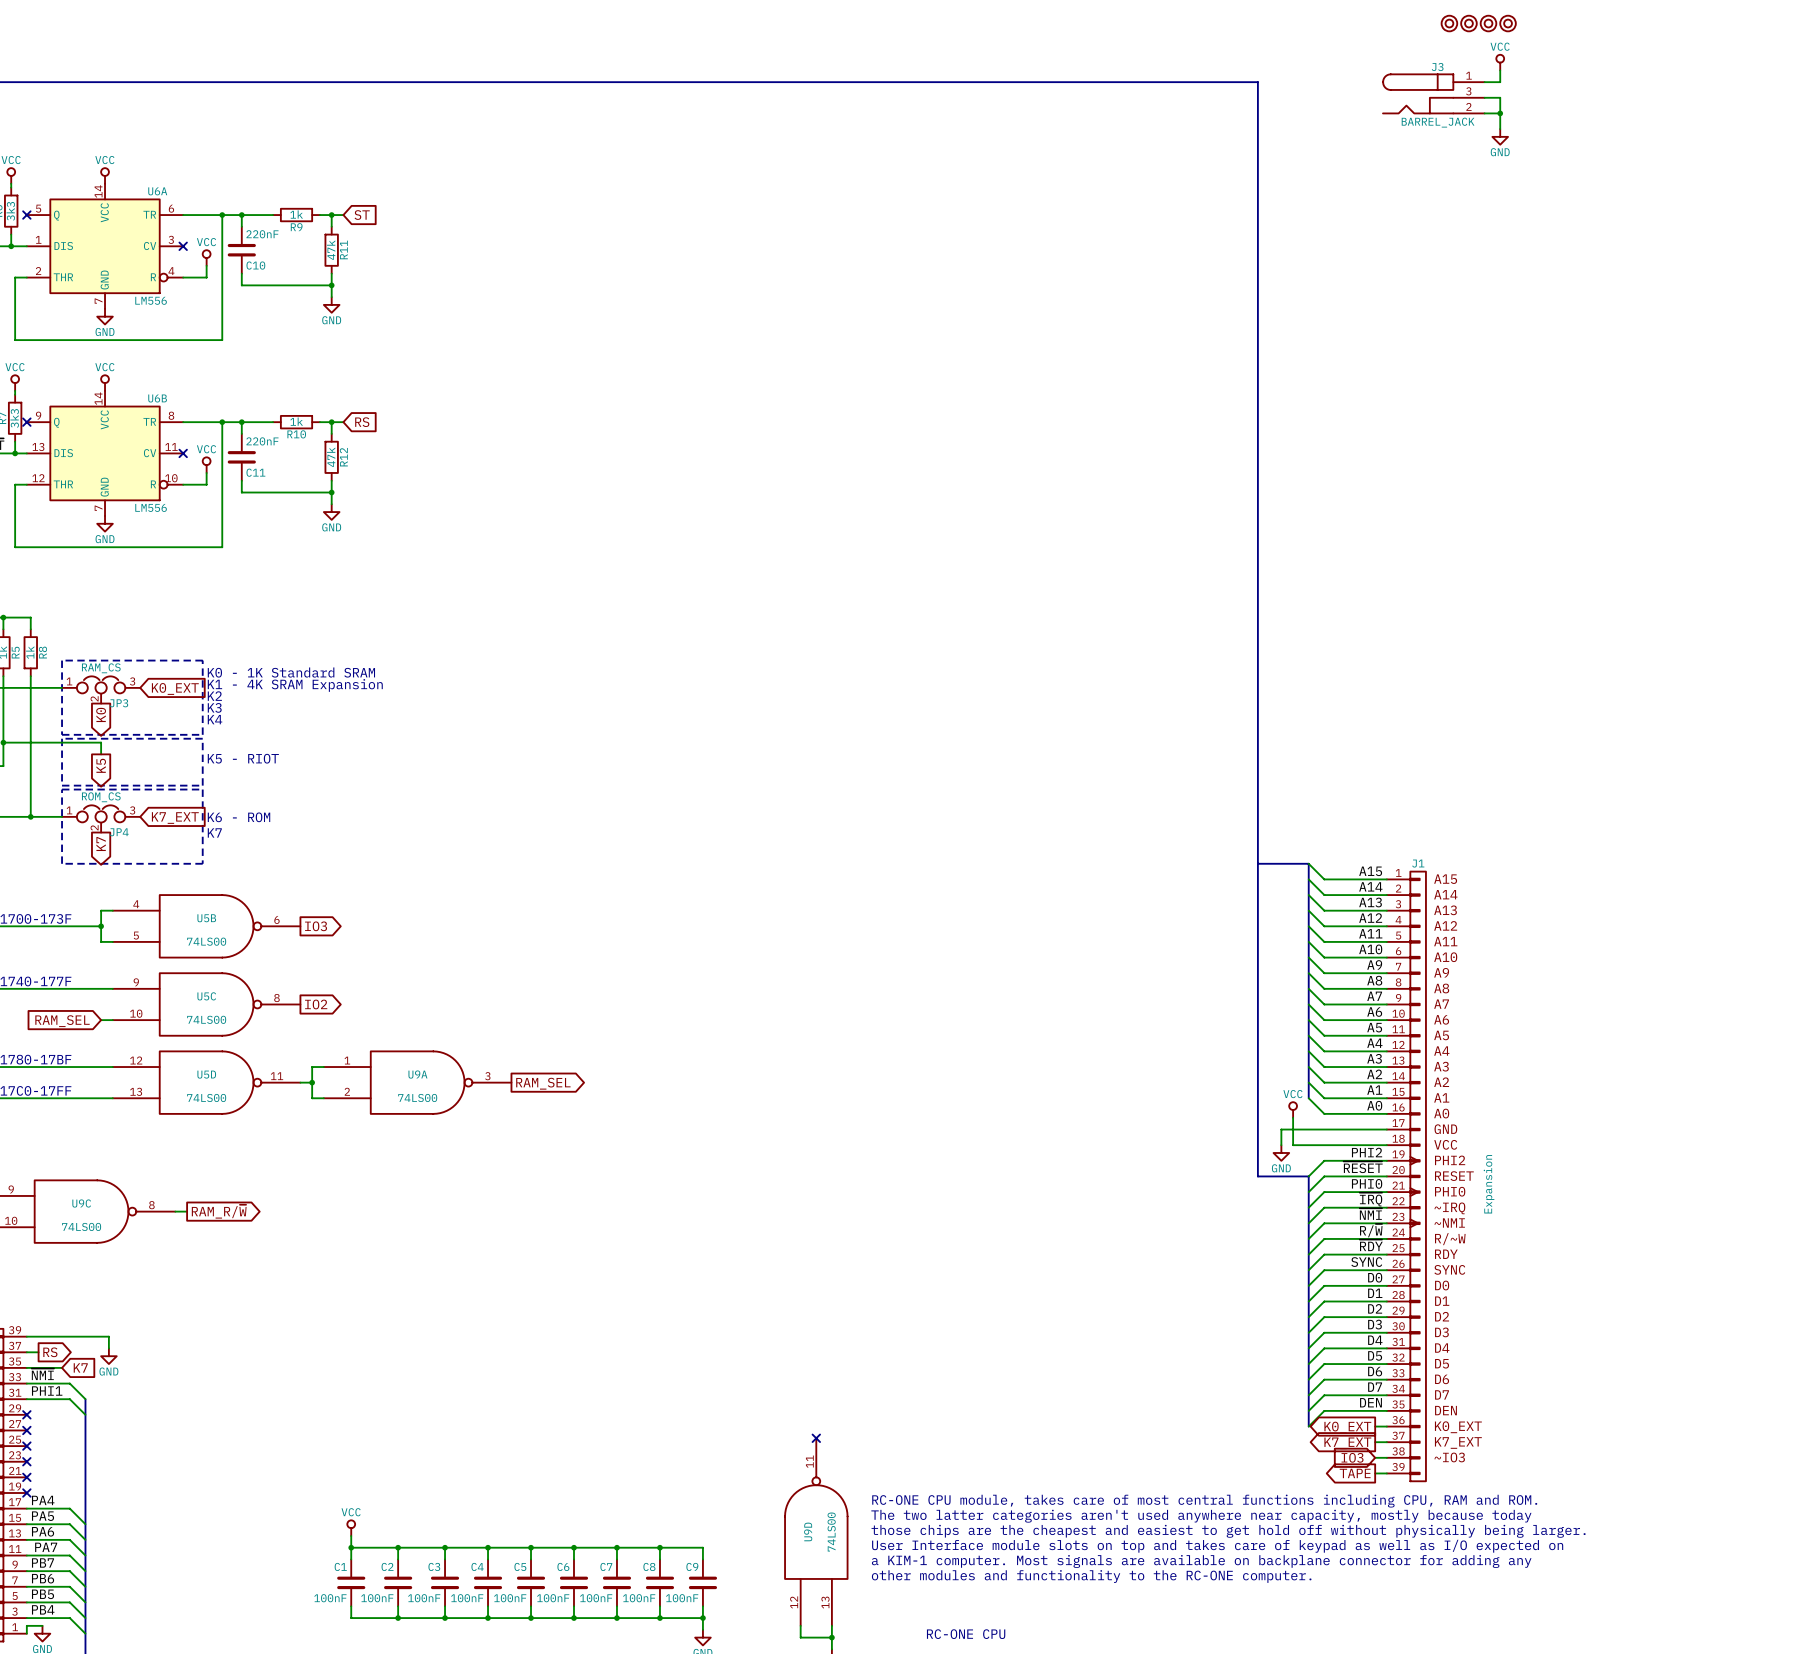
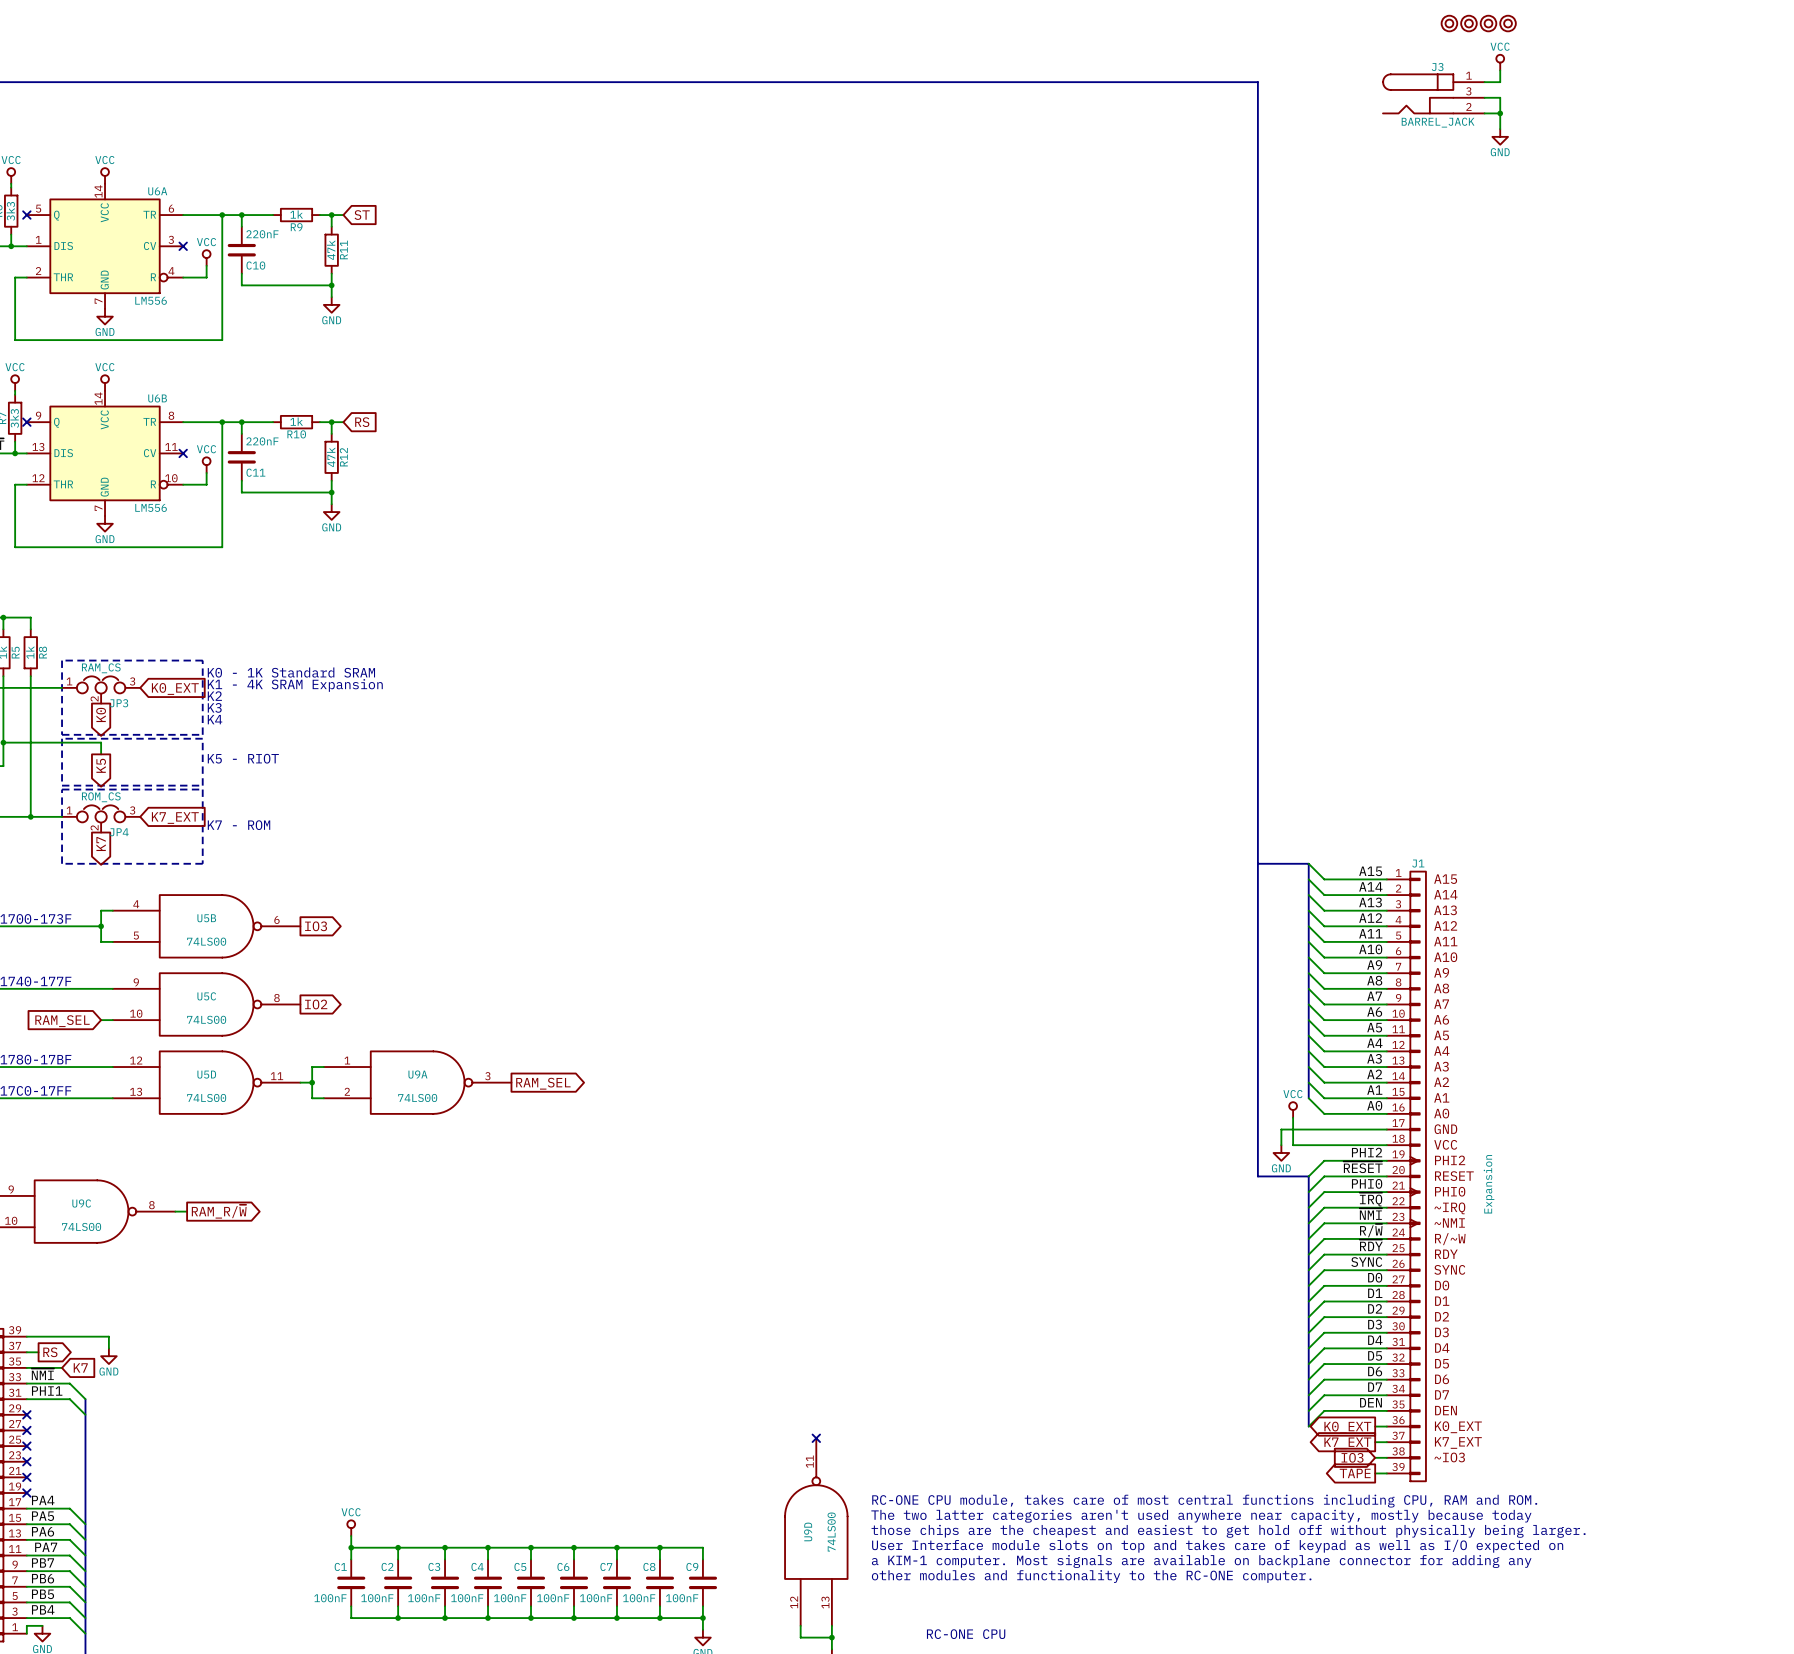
text: K6 - ROM (238, 817) -> K7 - ROM (238, 825)
text: K7 (214, 832) -> none

